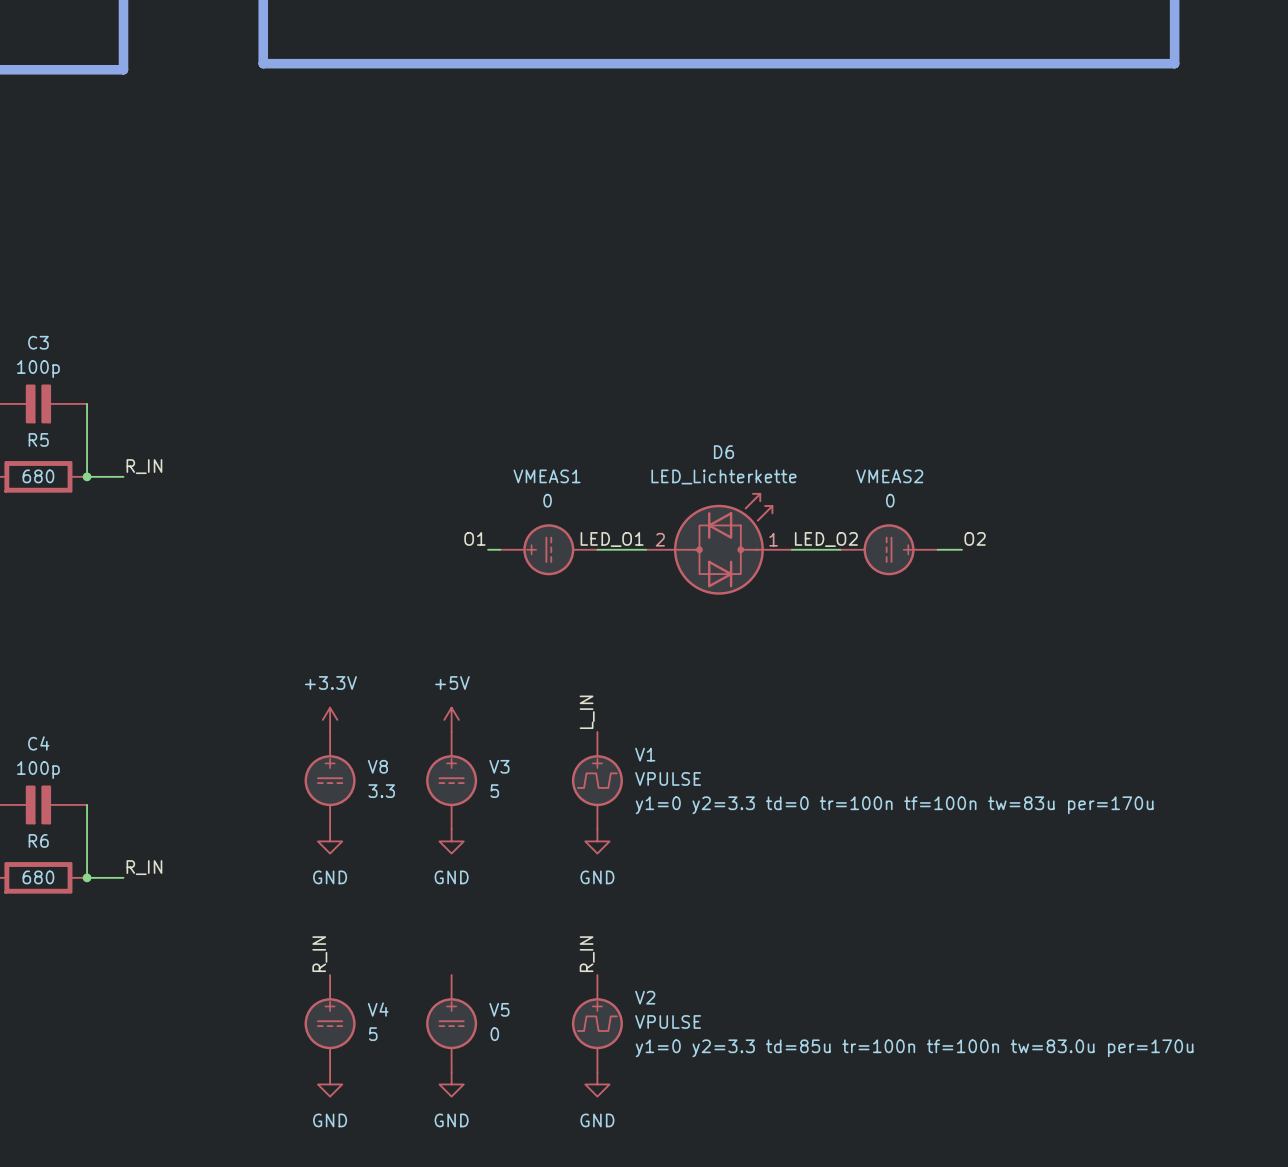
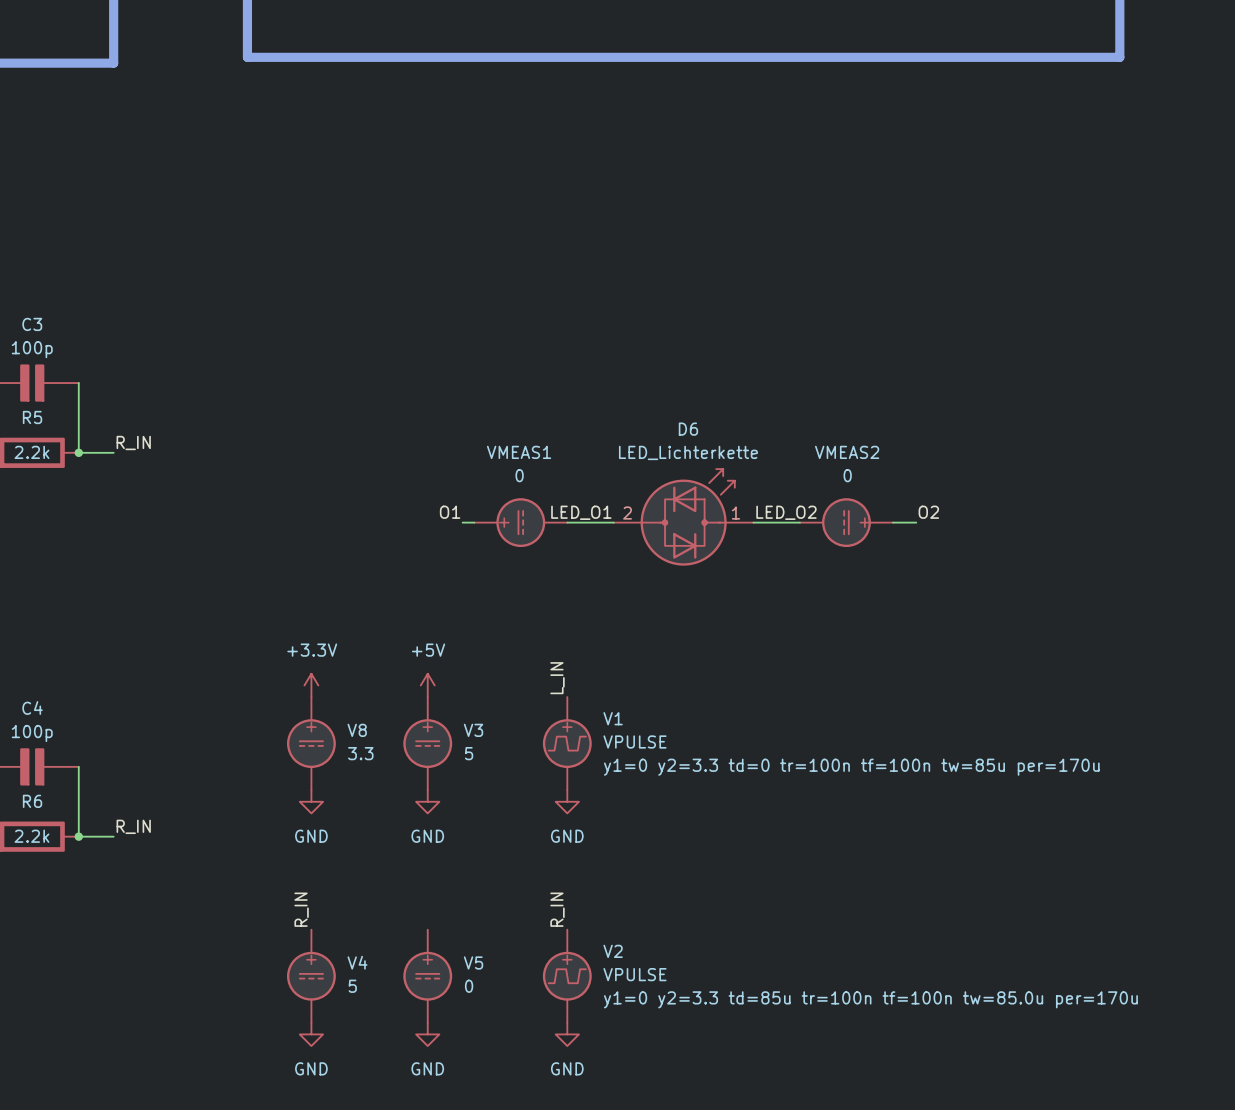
R5 value: 680 (38, 476) -> 2.2k (31, 452)
V1 text: y1=0 y2=3.3 td=0 tr=100n tf=100n tw=83u per=170u (894, 805) -> y1=0 y2=3.3 td=0 tr=100n tf=100n tw=85u per=170u (851, 767)
R6 value: 680 (38, 877) -> 2.2k (31, 836)
V2 text: y1=0 y2=3.3 td=85u tr=100n tf=100n tw=83.0u per=170u (914, 1048) -> y1=0 y2=3.3 td=85u tr=100n tf=100n tw=85.0u per=170u (870, 999)

